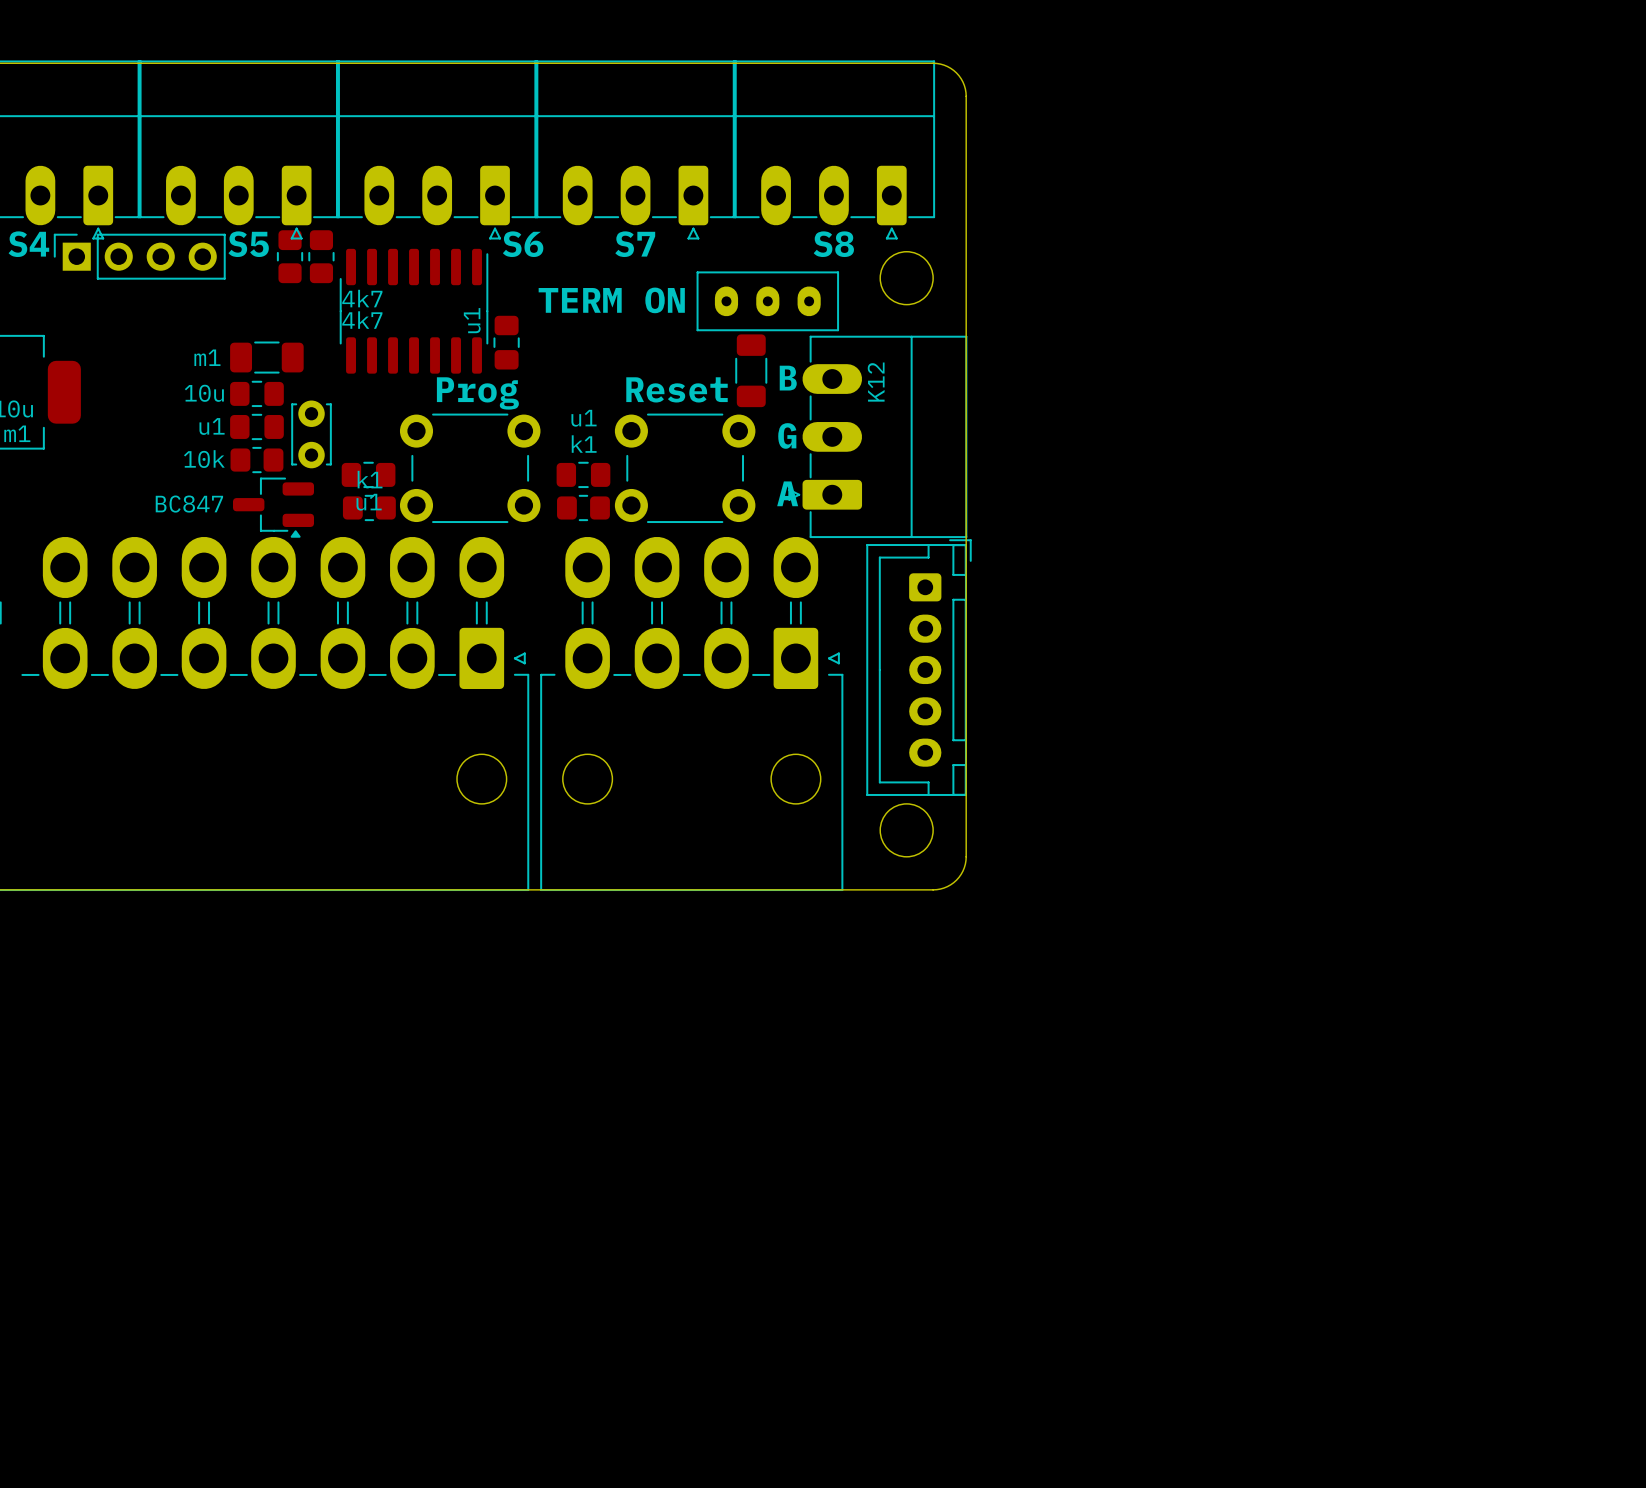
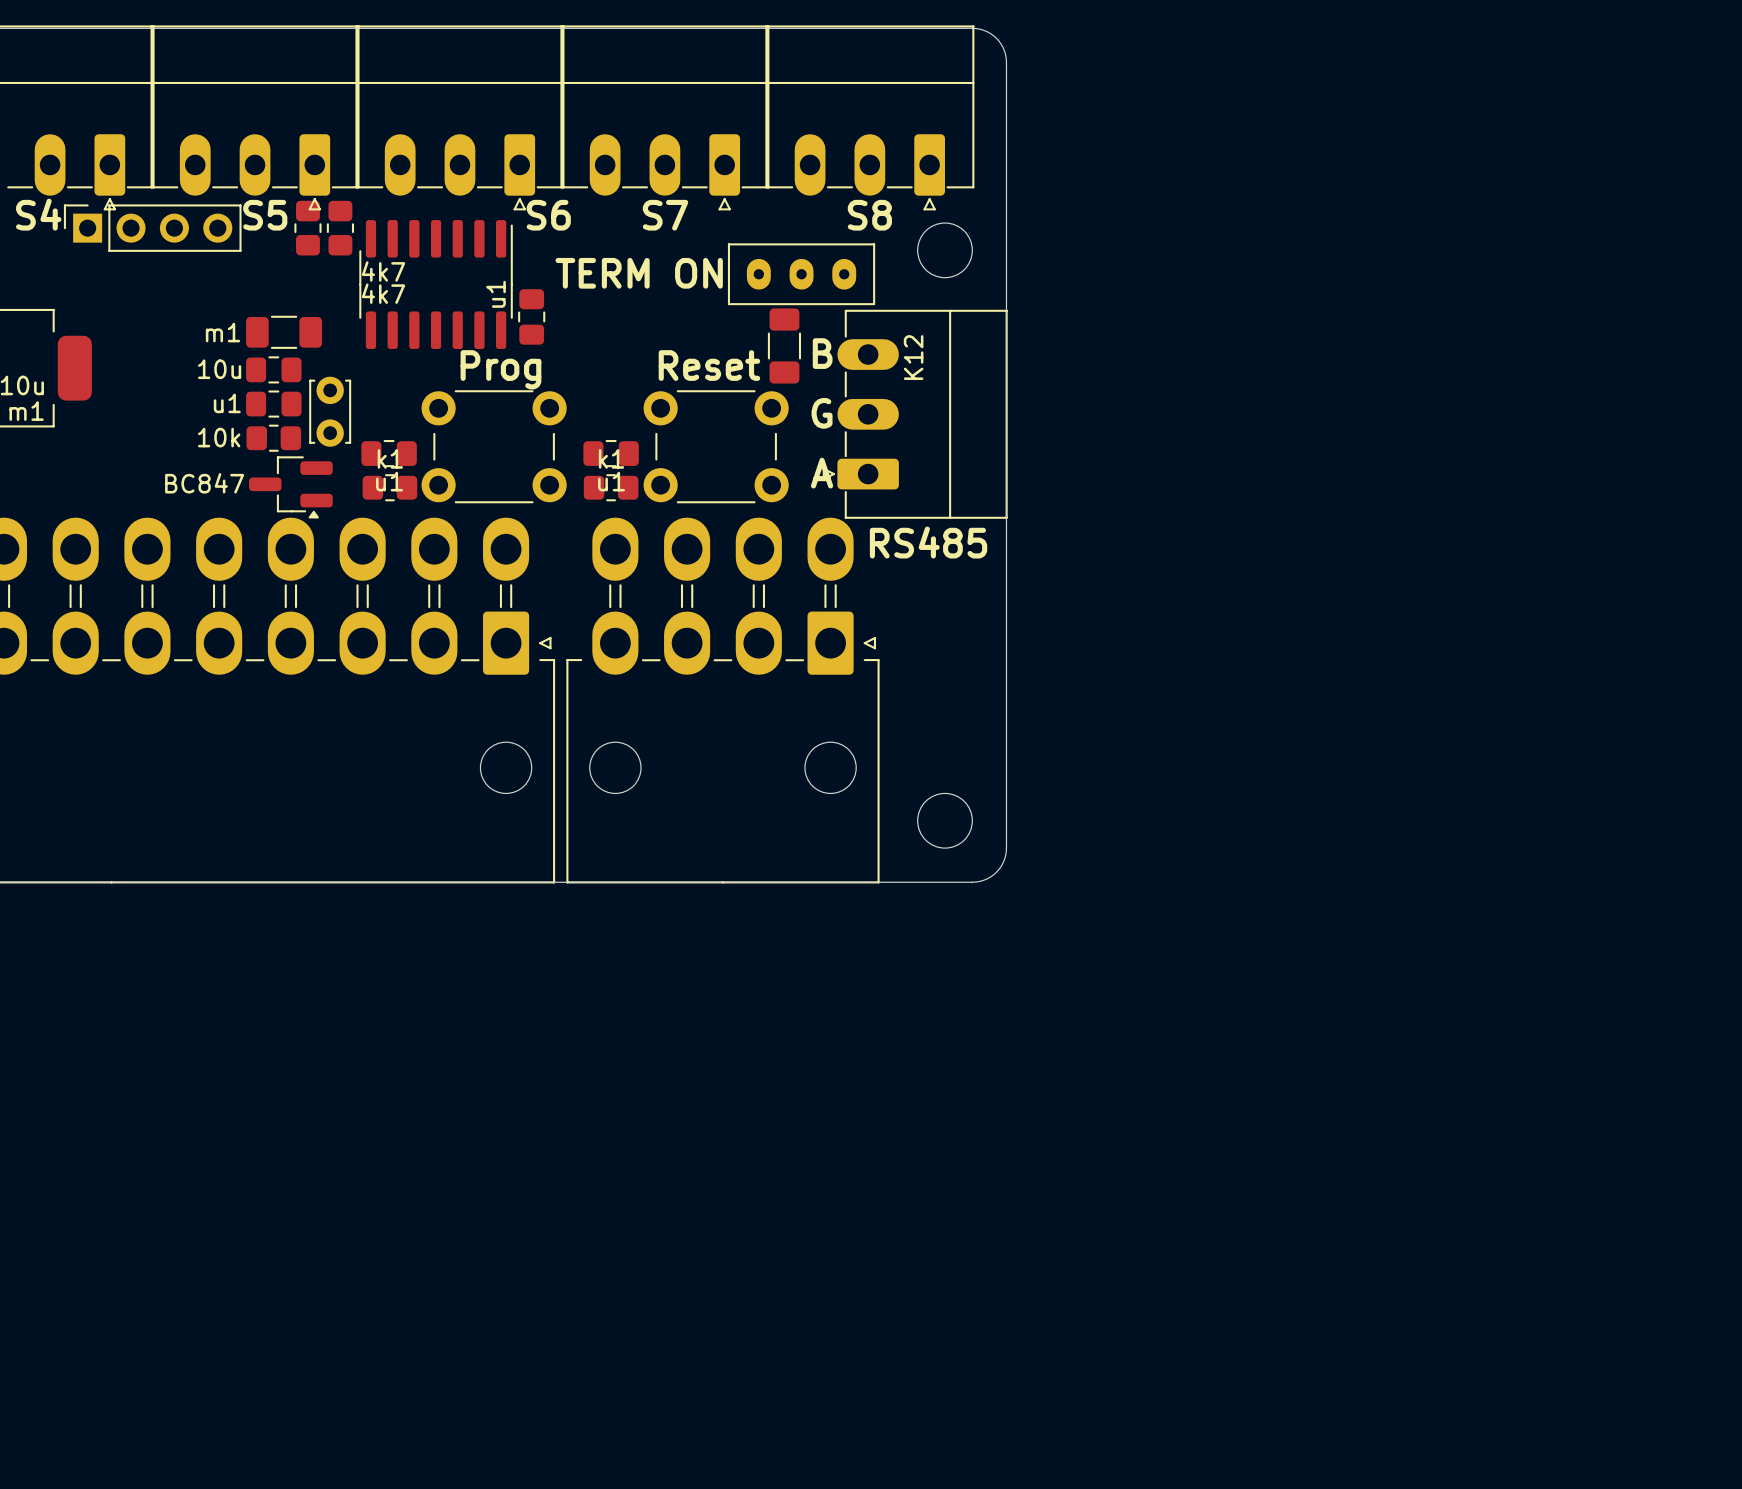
part value position: u1 (584, 418) -> u1 (611, 481)
part value position: k1 (584, 444) -> k1 (611, 458)
text: none -> RS485 (928, 542)
part: (918, 667) -> none

